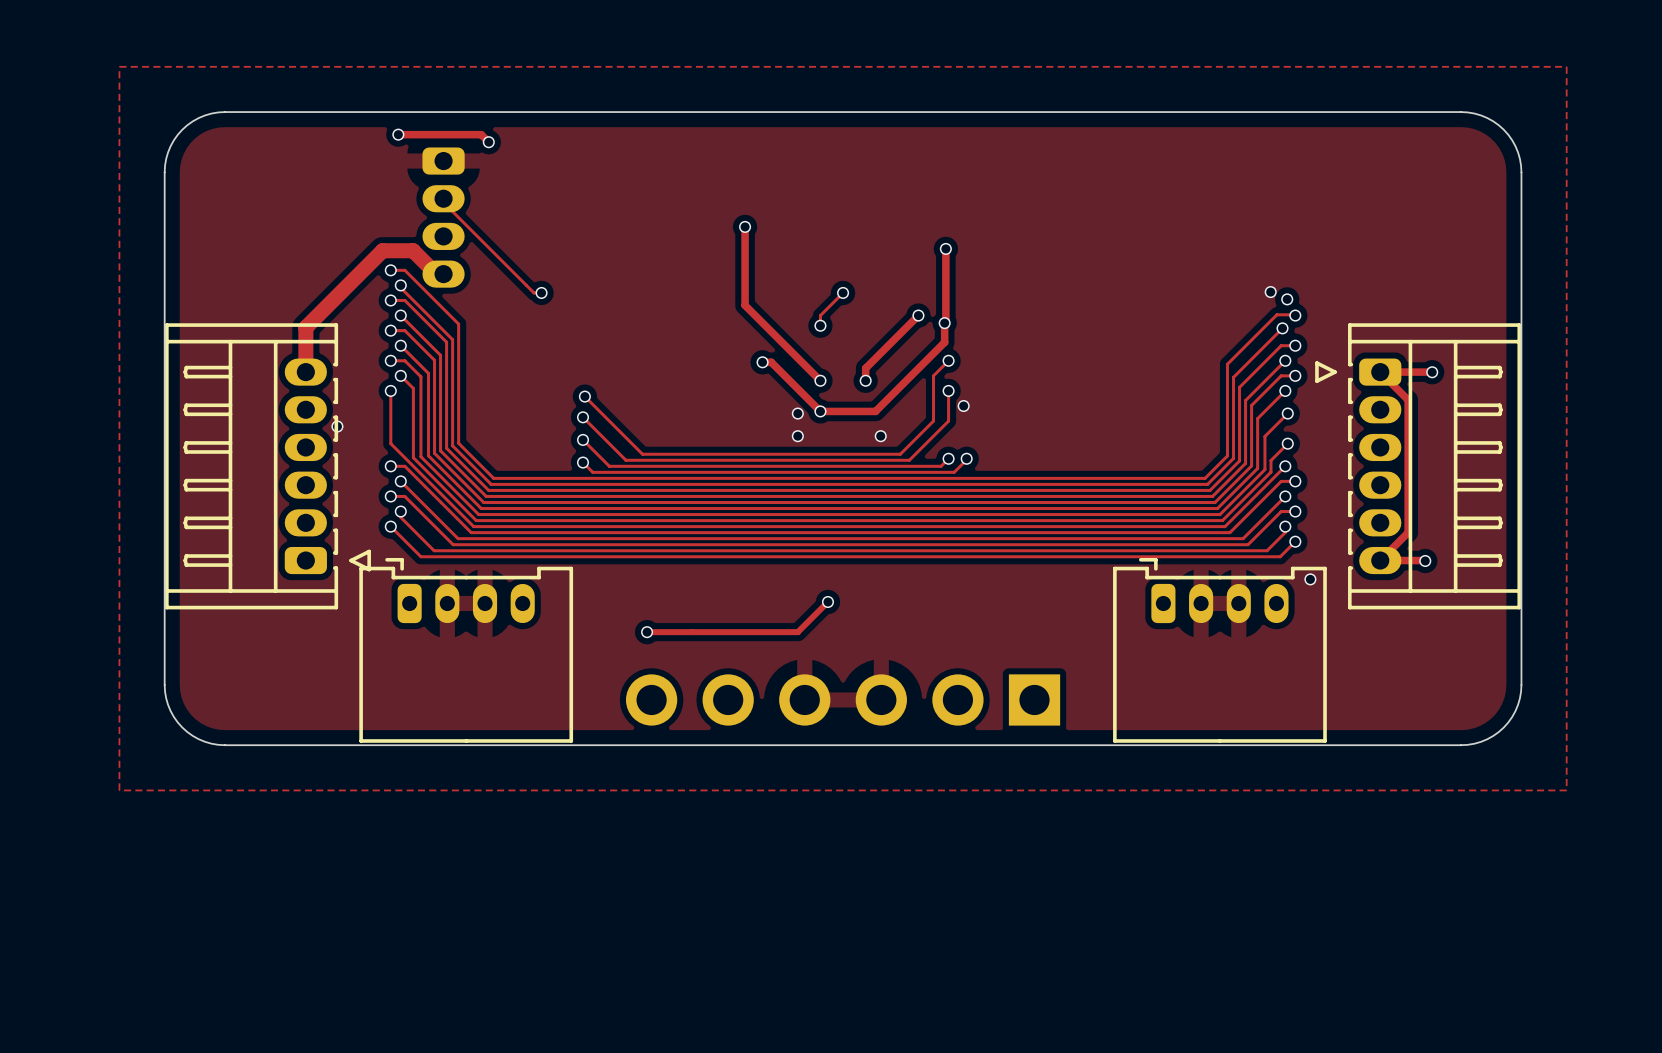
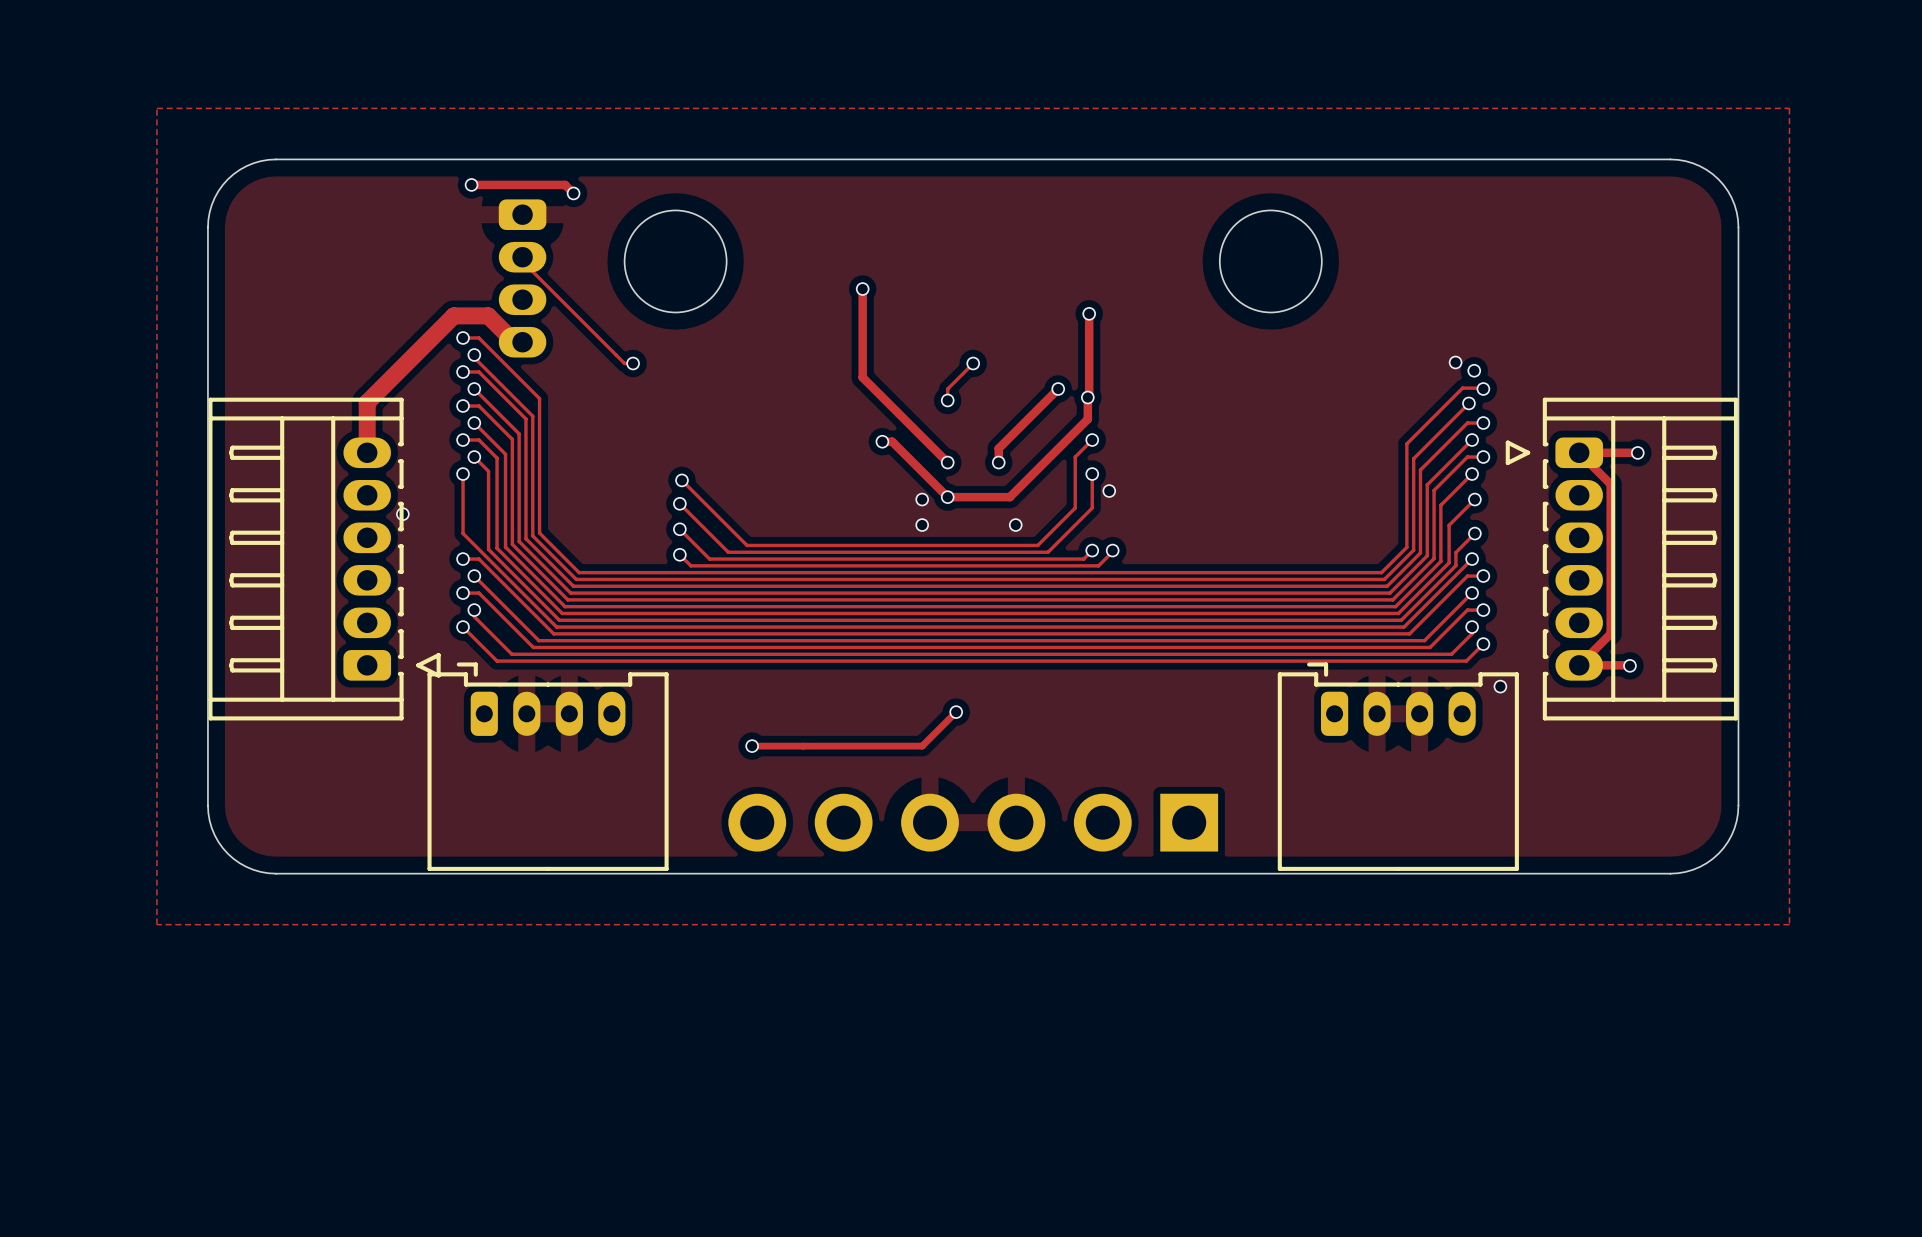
round board edge: none -> [623, 209, 728, 314]
round board edge: none -> [1218, 209, 1323, 314]

